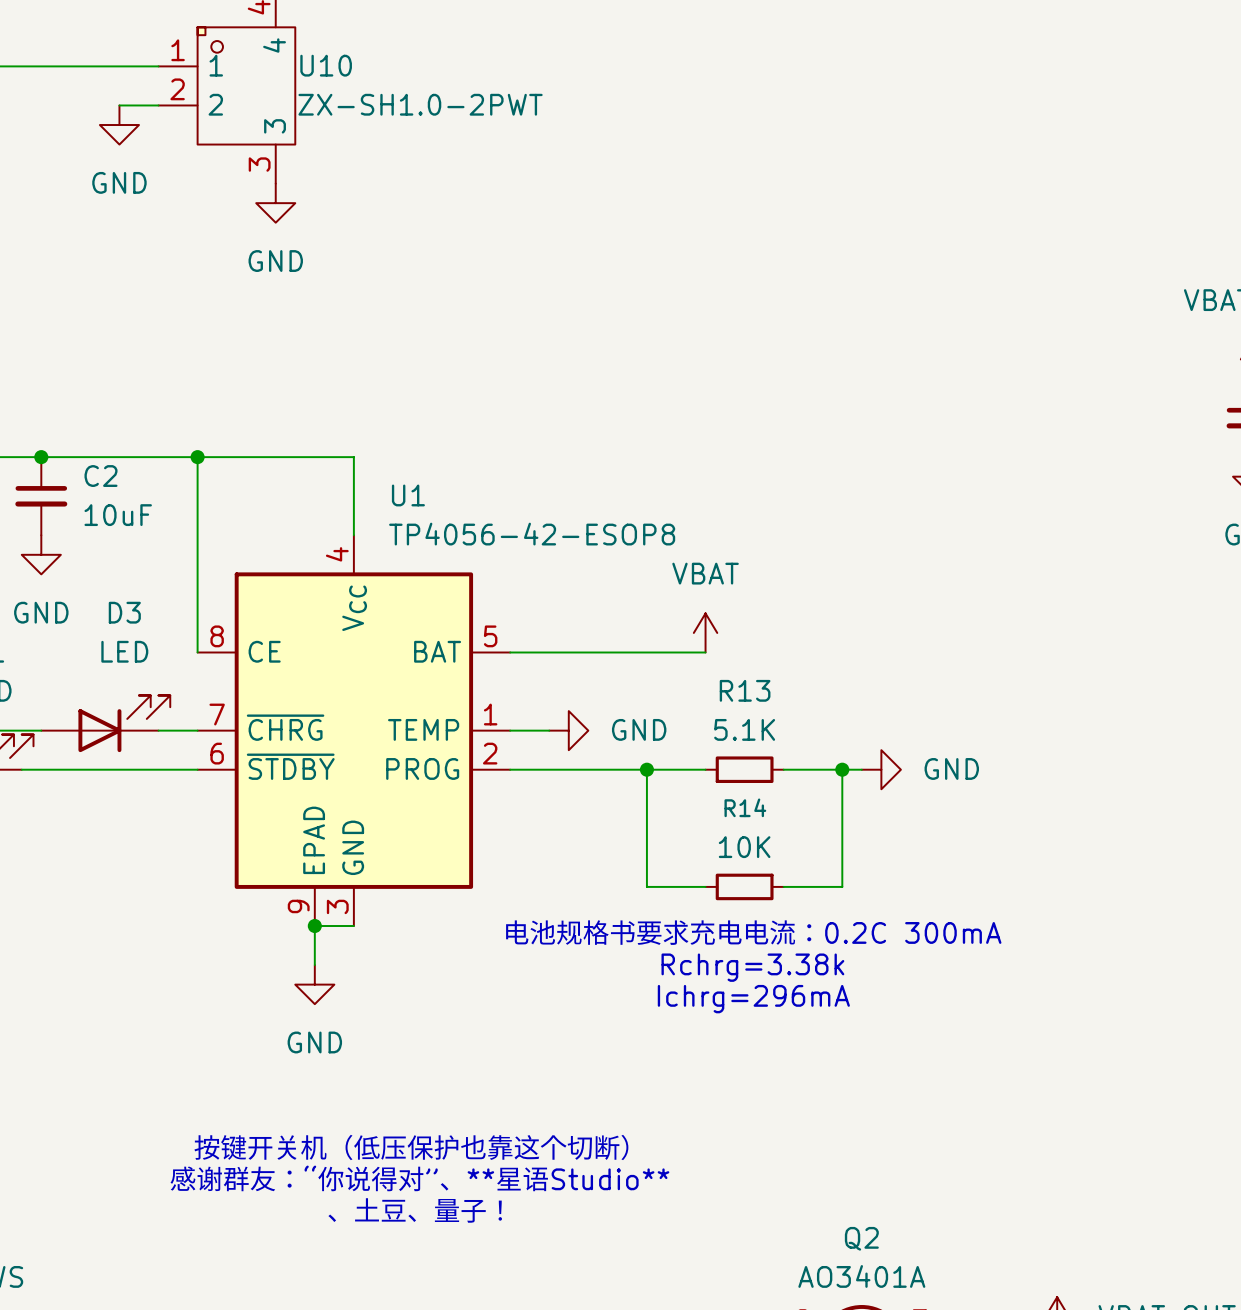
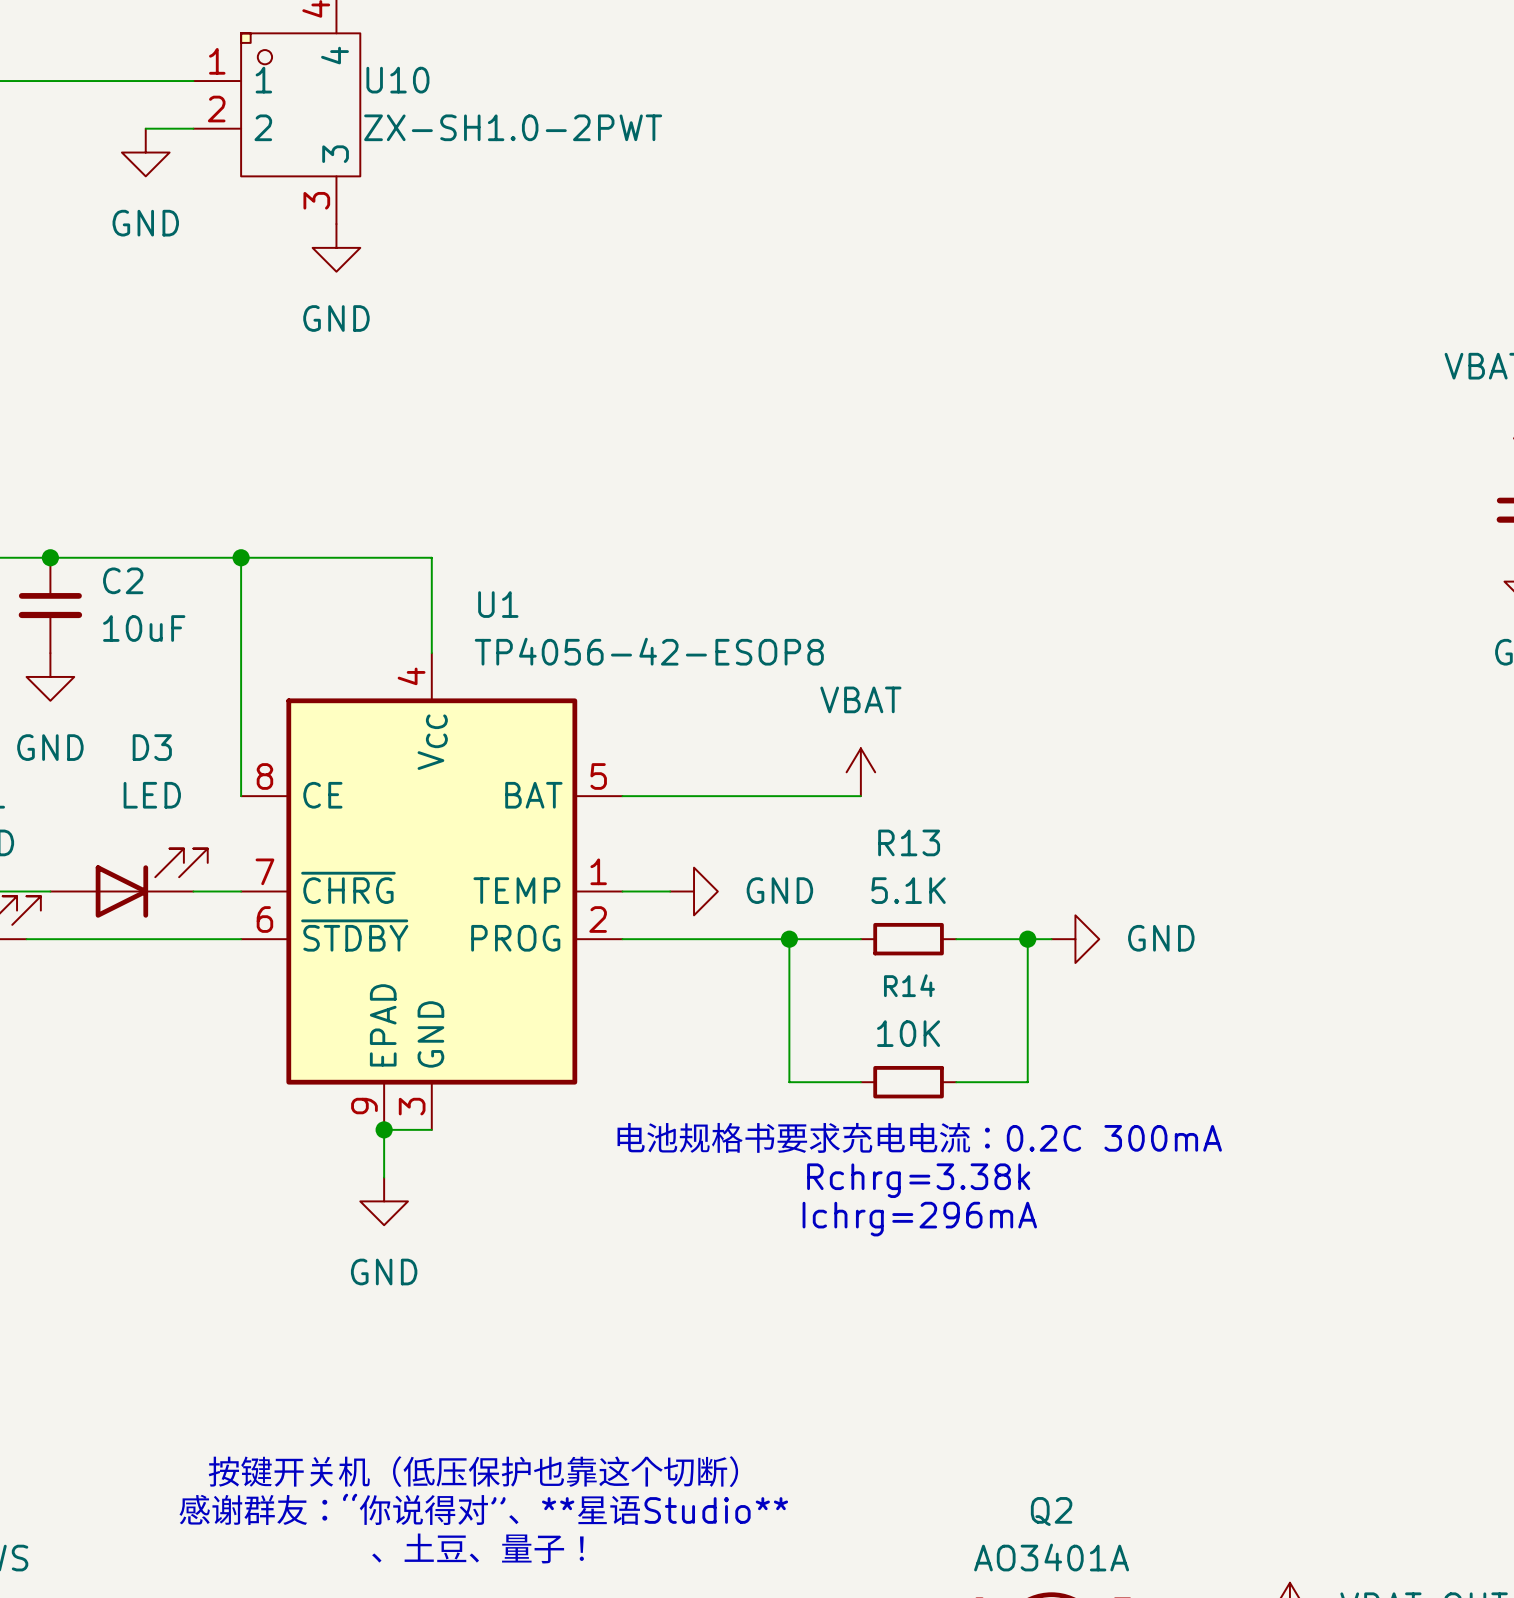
text position: 按键开关机（低压保护也靠这个切断） (411, 1147) -> 按键开关机（低压保护也靠这个切断） (473, 1471)
text position: 感谢群友：“你说得对”、**星语Studio** (419, 1178) -> 感谢群友：“你说得对”、**星语Studio** (483, 1509)
text position: 、土豆、量子！ (415, 1210) -> 、土豆、量子！ (478, 1548)

